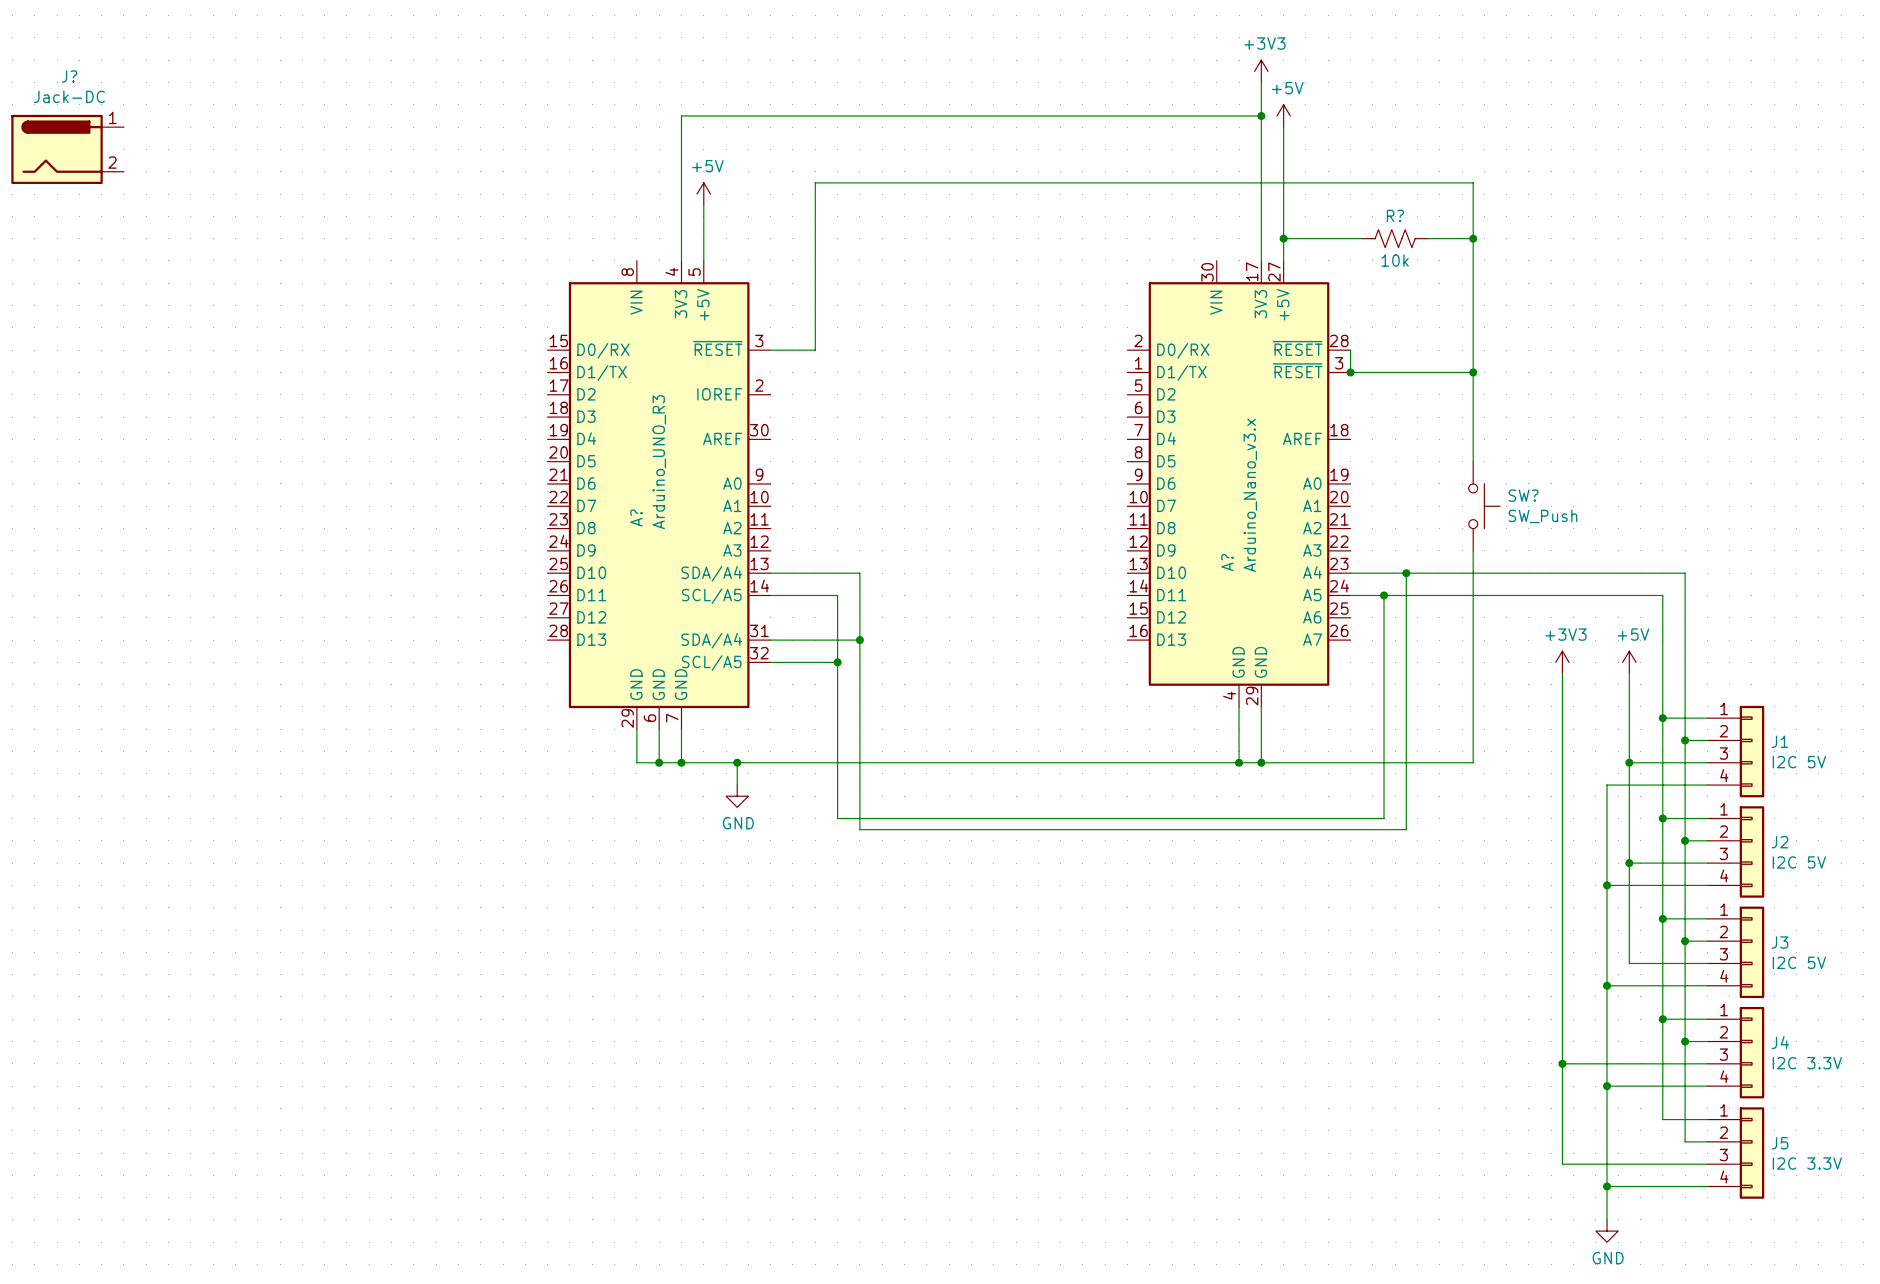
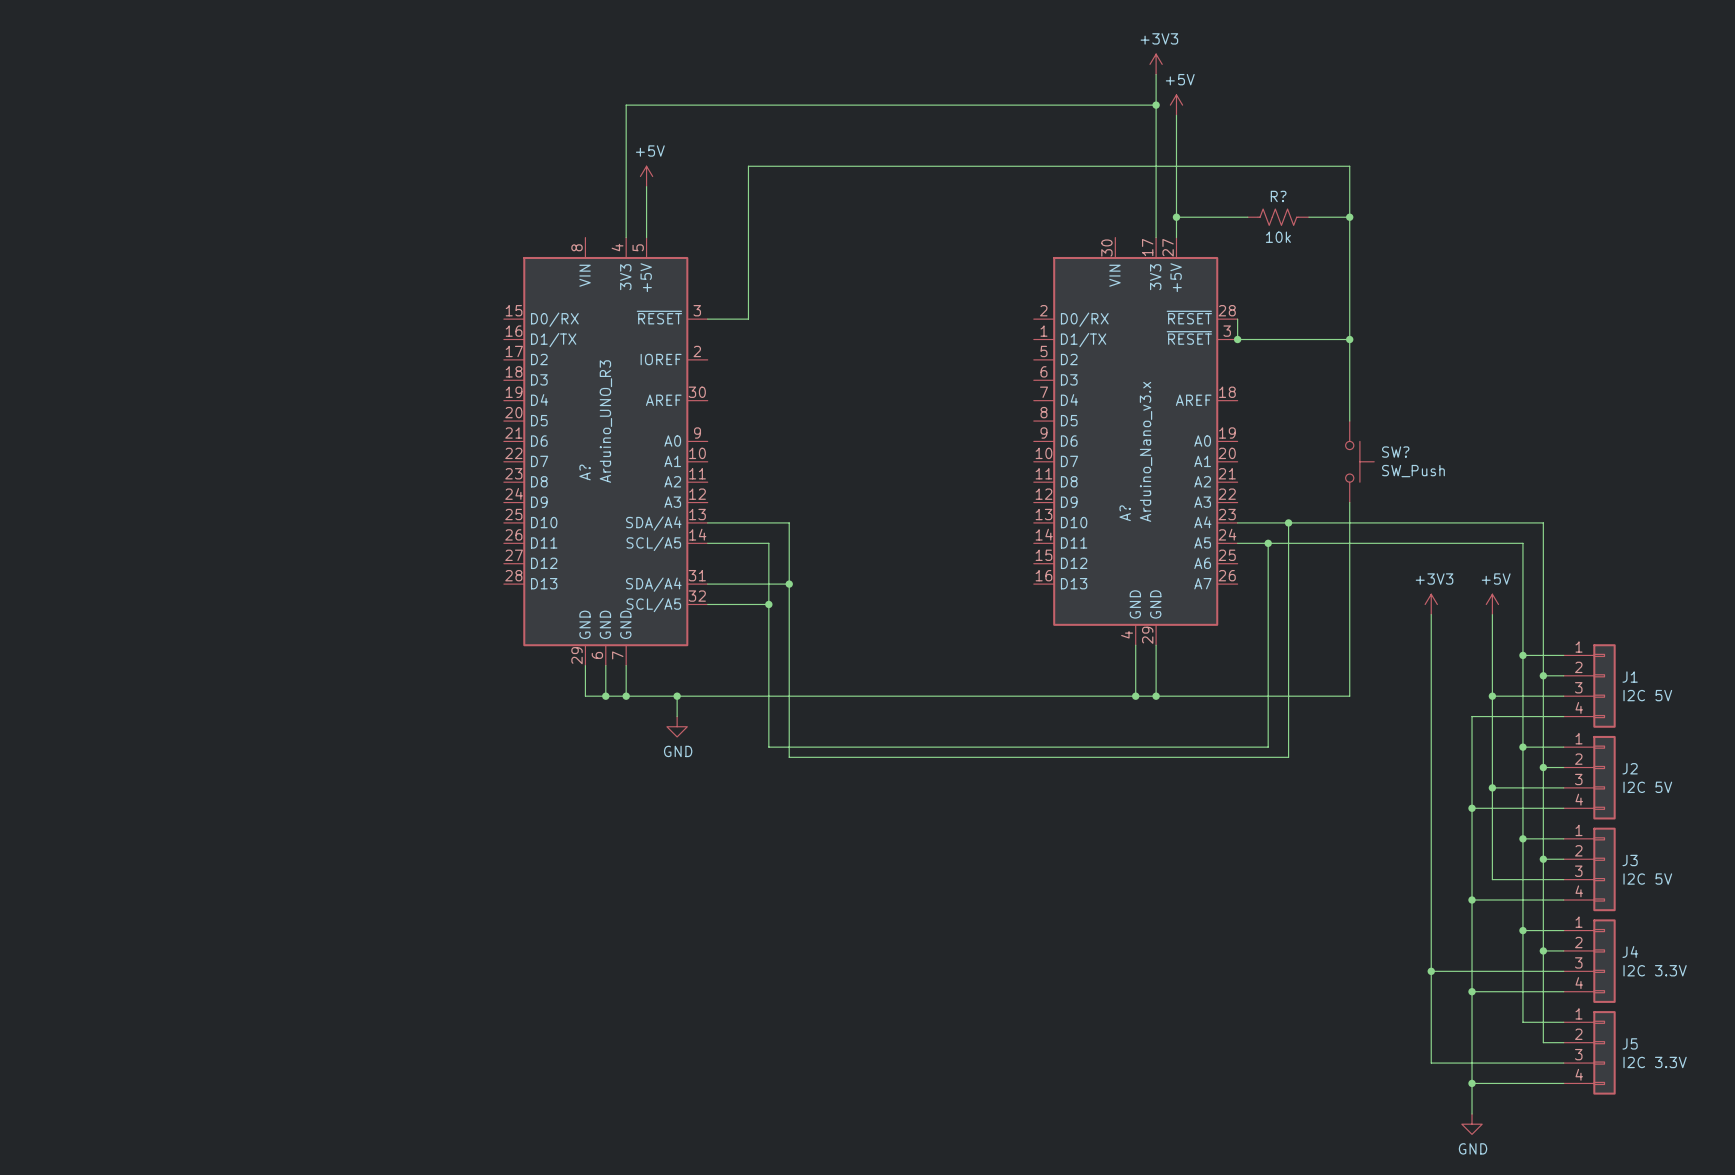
J?: Jack-DC (67, 149) -> none

